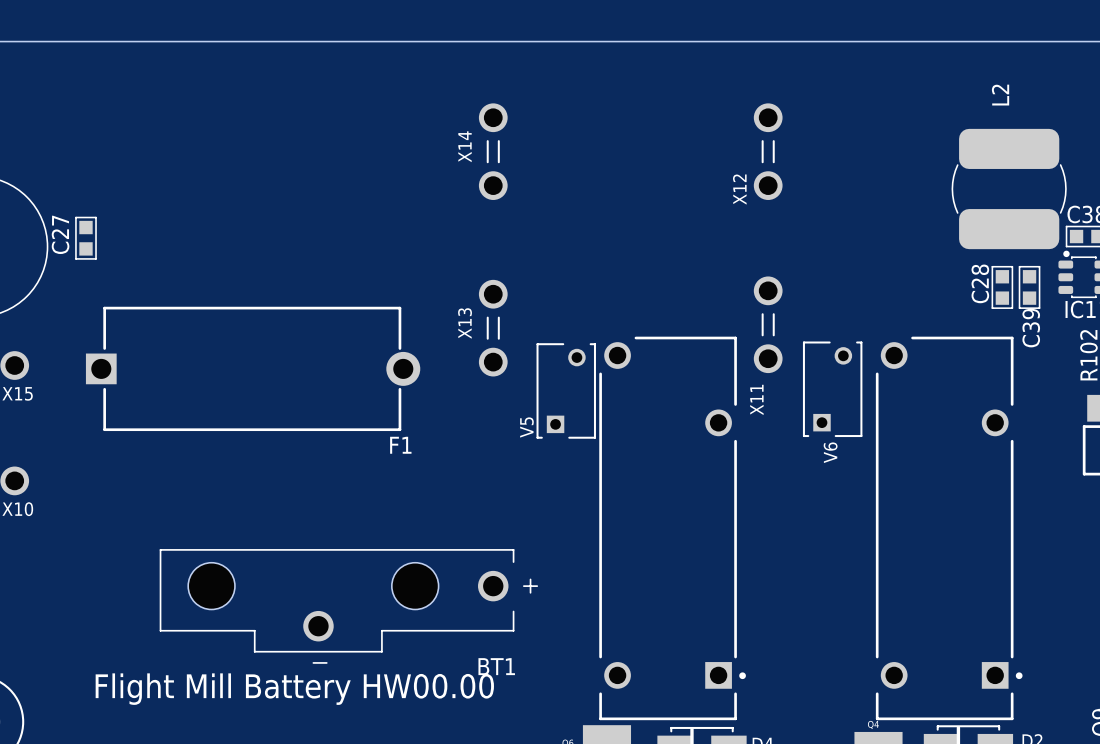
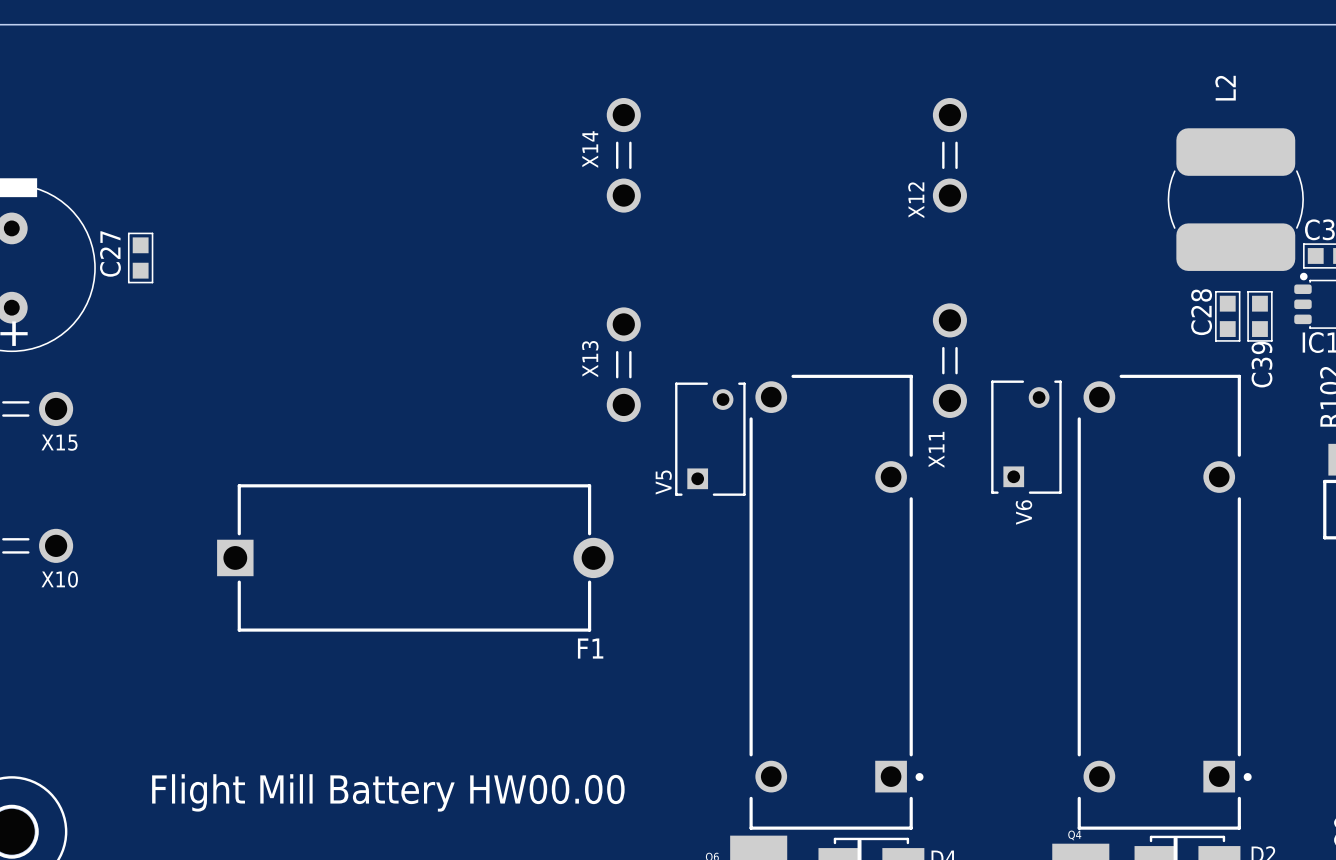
F1 position: (253, 368) -> (415, 557)
BT1: (348, 606) -> none

